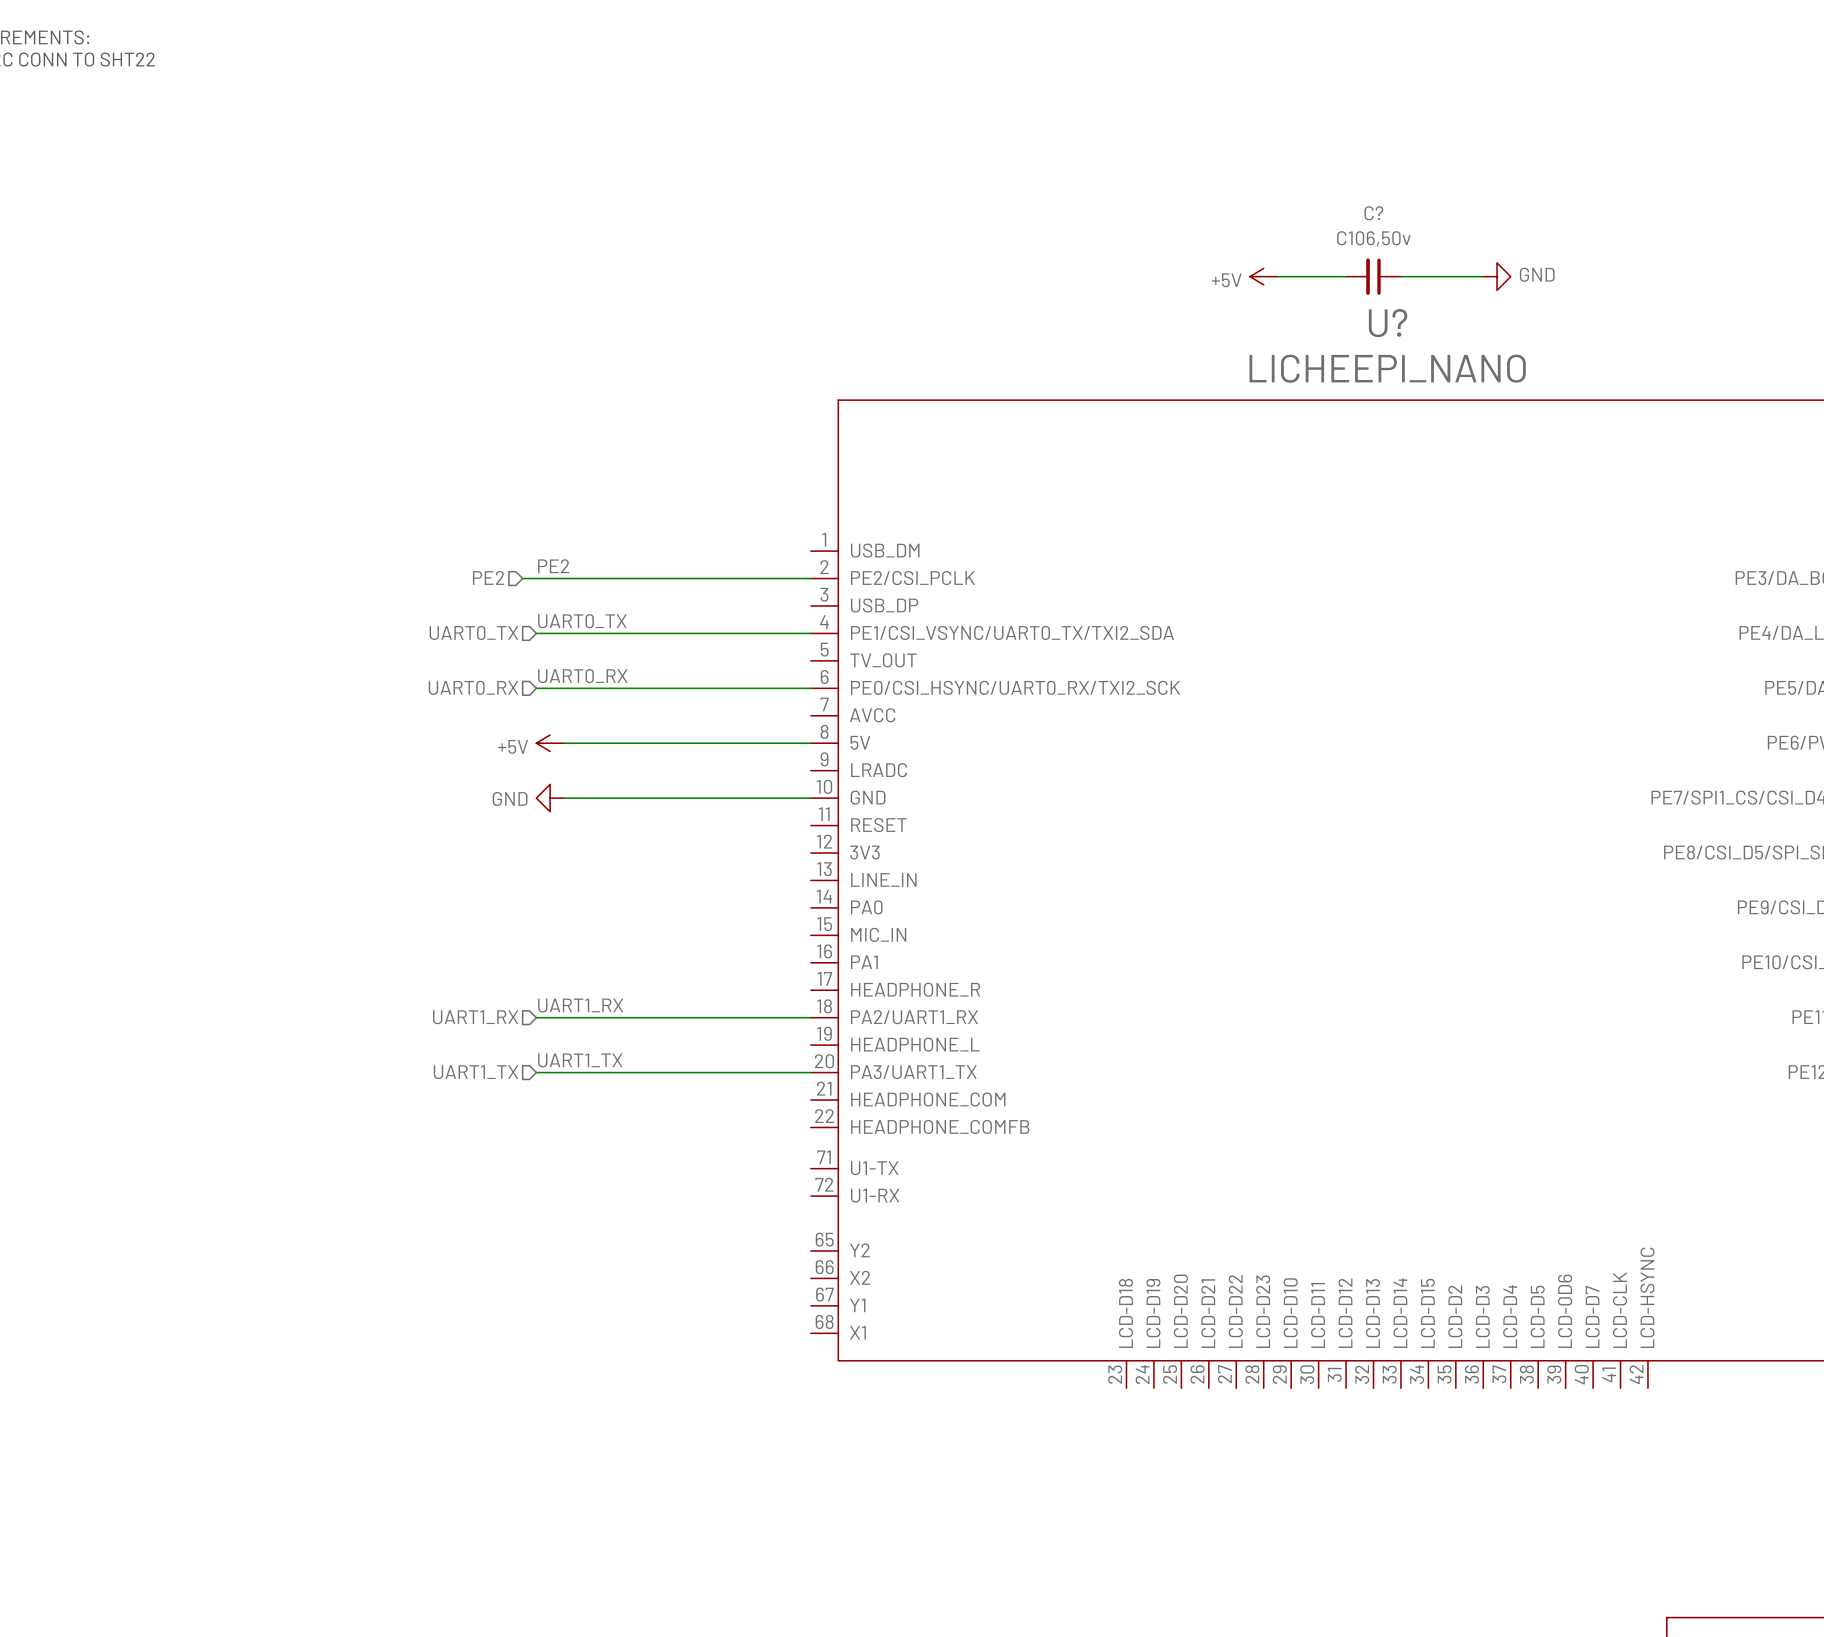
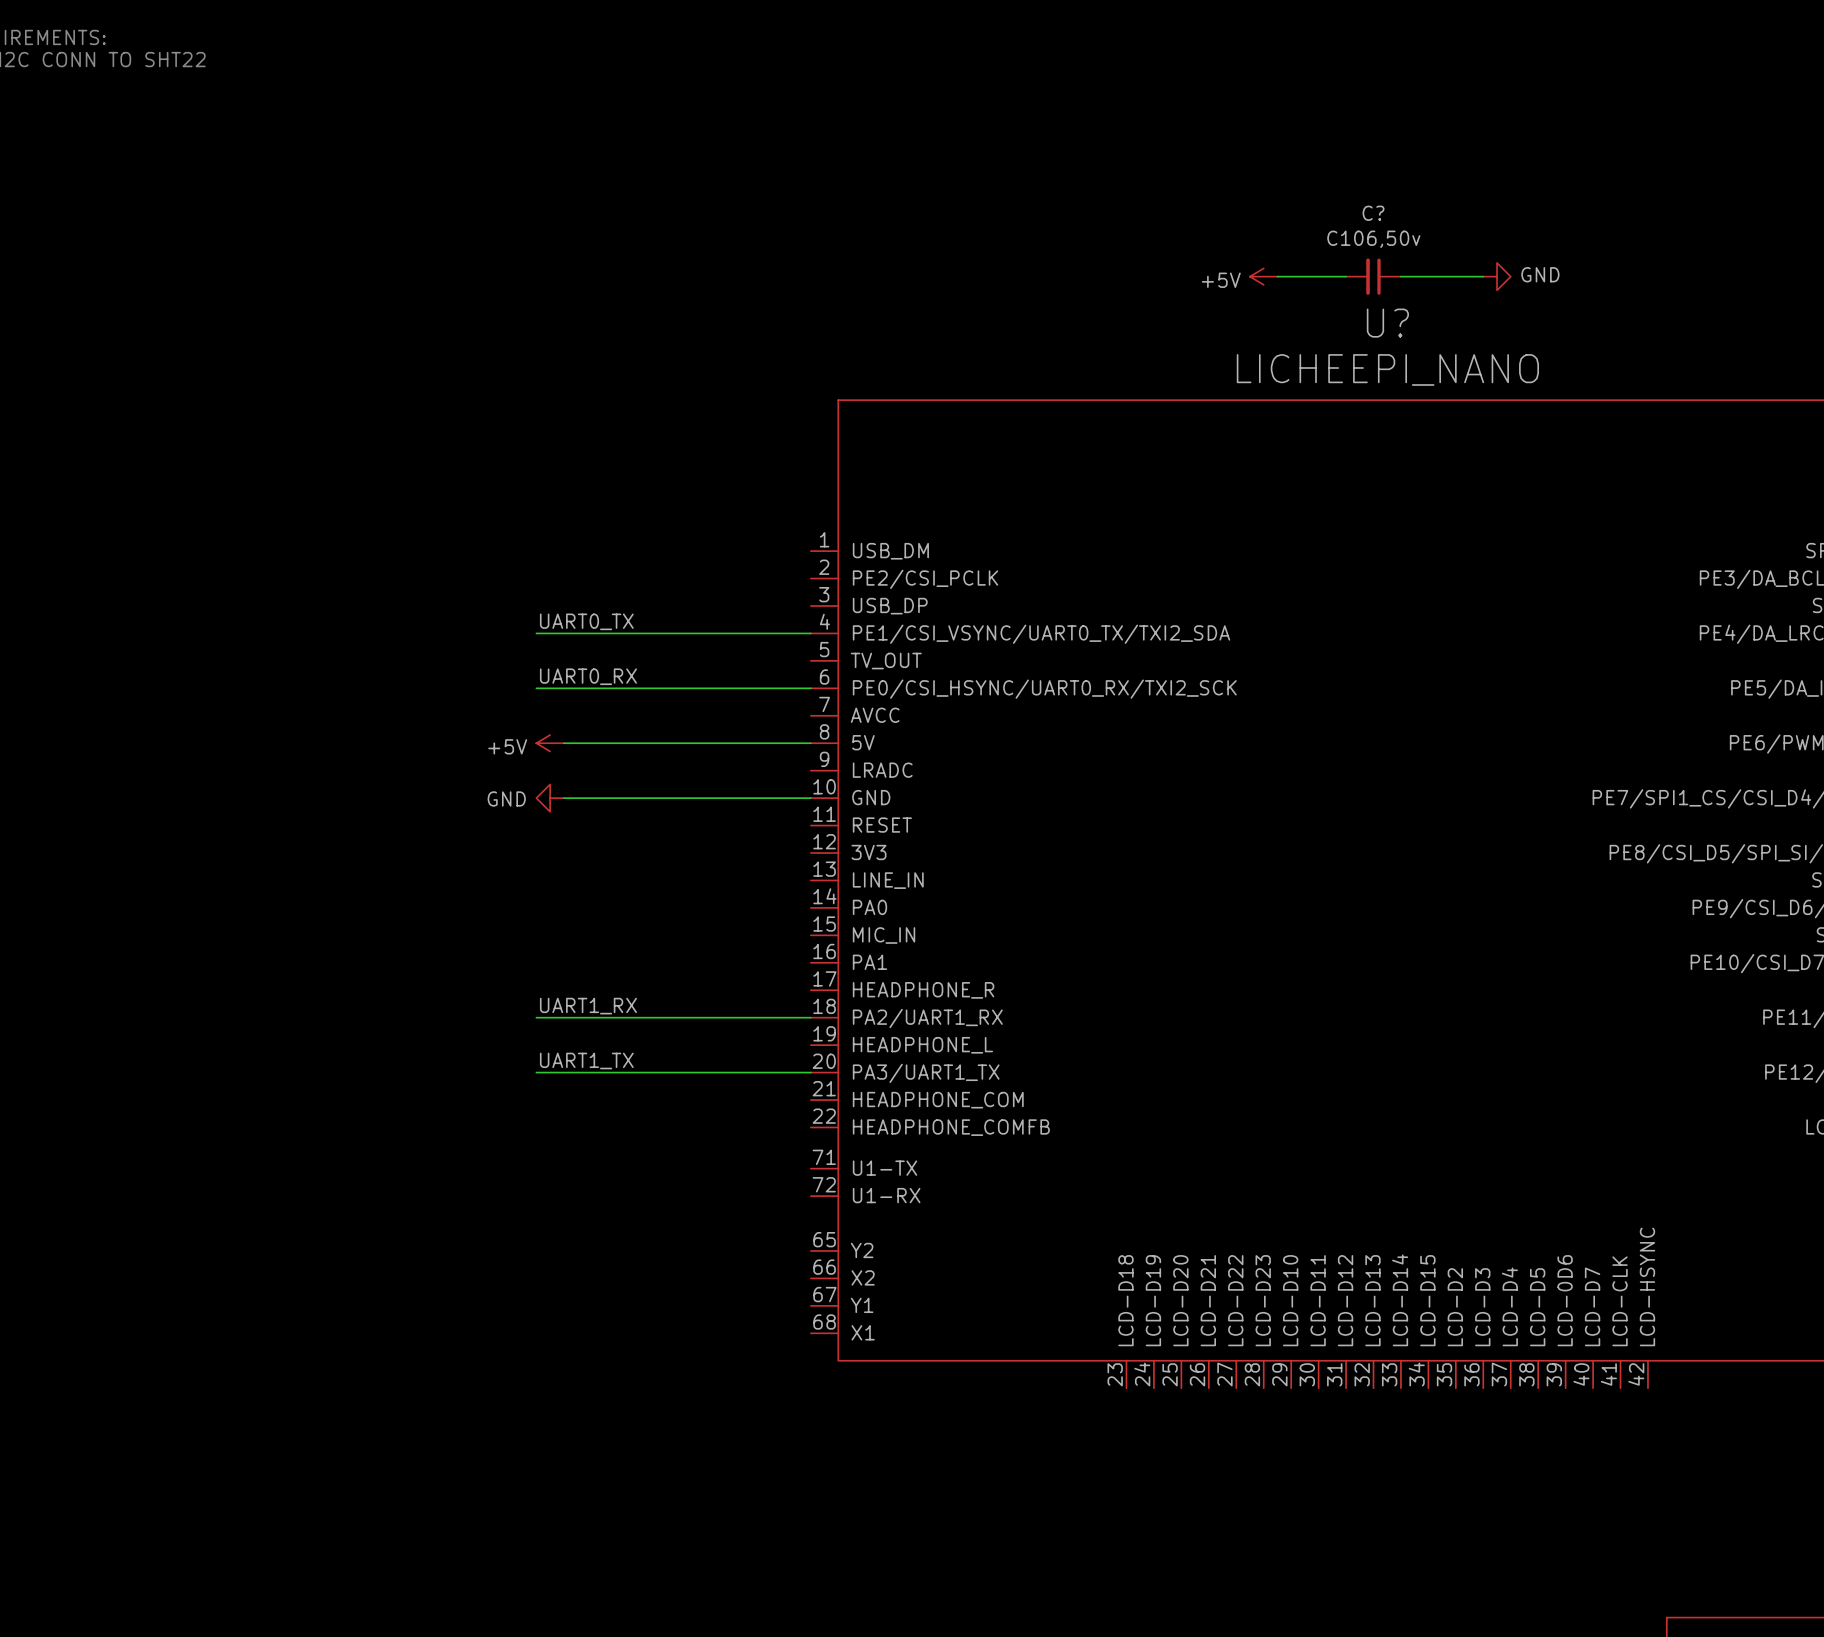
label: PE2 (553, 566) -> none
hierarchical label: PE2 (488, 577) -> none
wire: (522, 578) (810, 578) -> none
hierarchical label: UART0_TX (473, 632) -> none
hierarchical label: UART0_RX (473, 687) -> none
hierarchical label: UART1_RX (475, 1017) -> none
hierarchical label: UART1_TX (476, 1072) -> none

